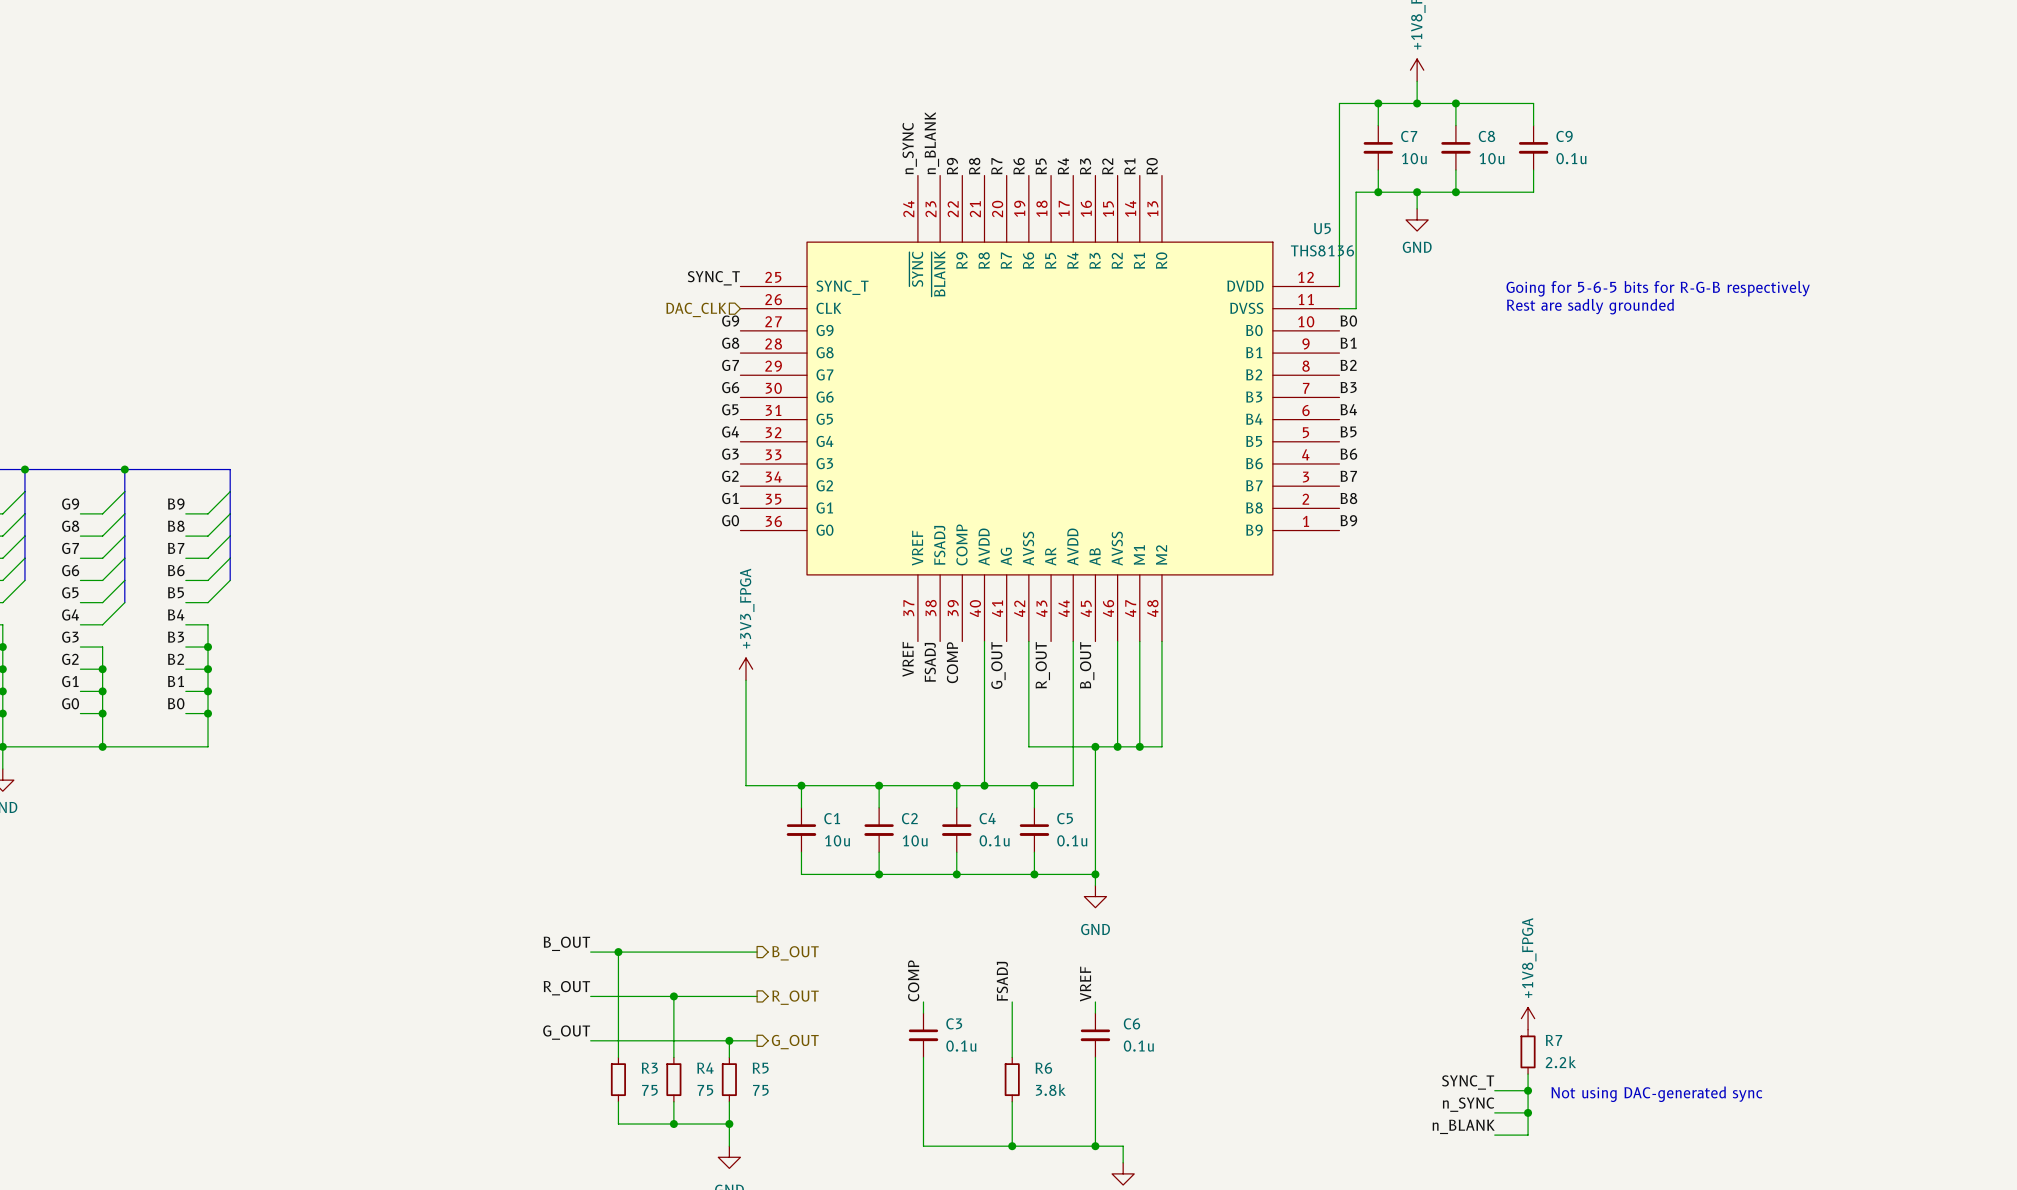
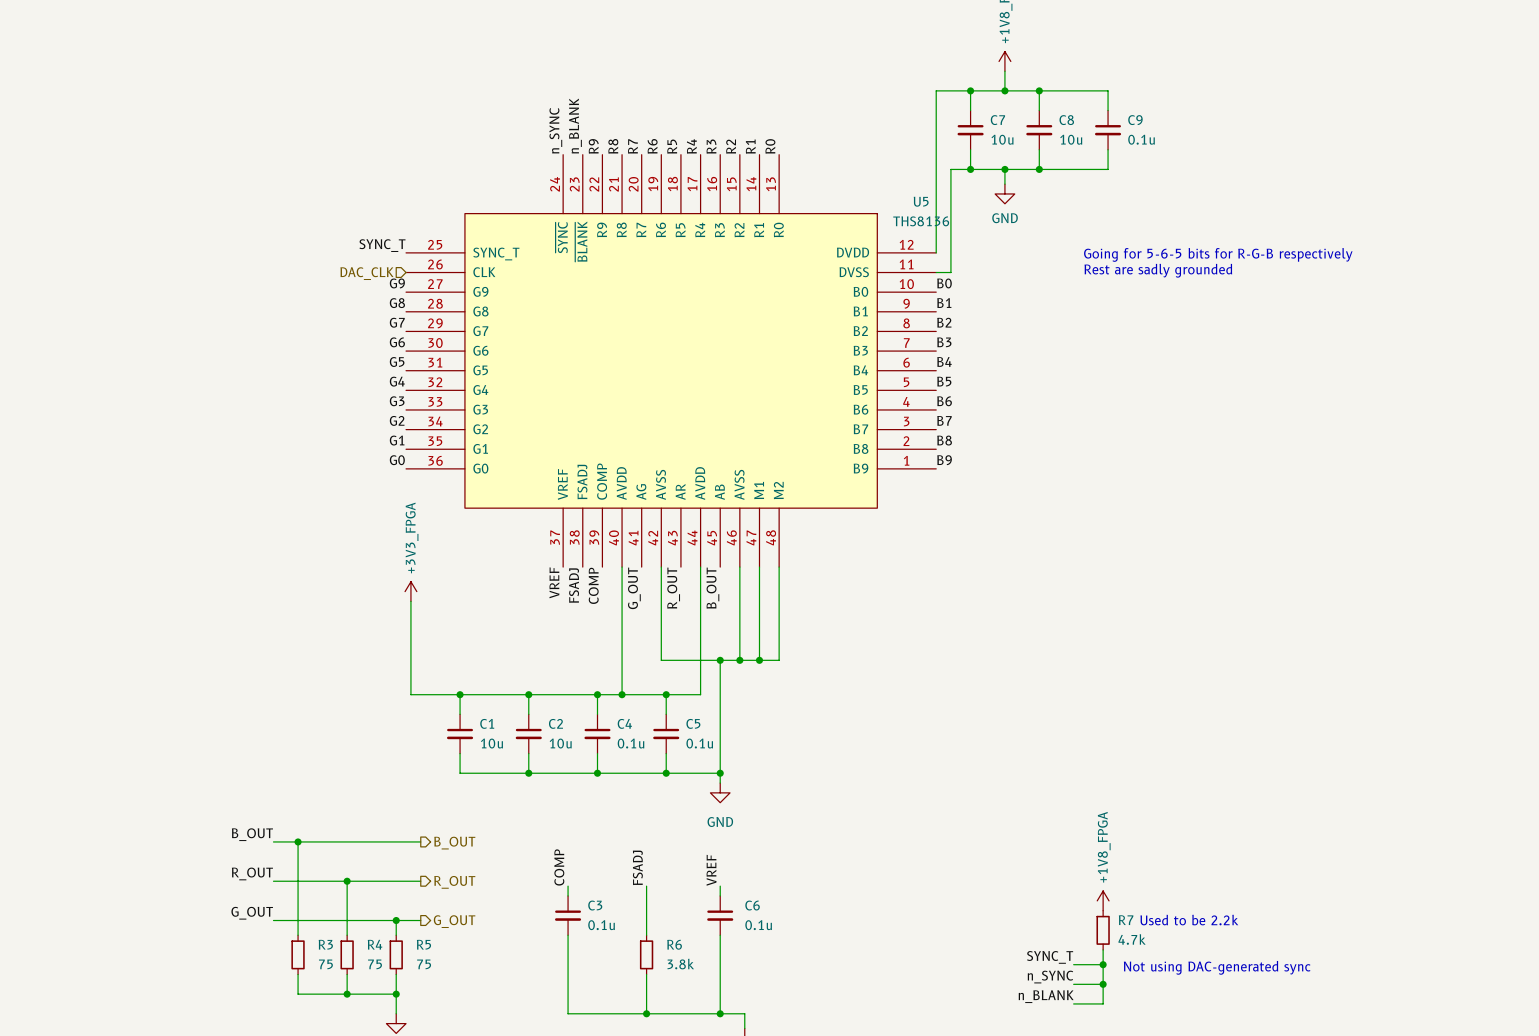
text: none -> Used to be 2.2k (1189, 920)
R7 value: 2.2k (1560, 1062) -> 4.7k (1132, 939)

